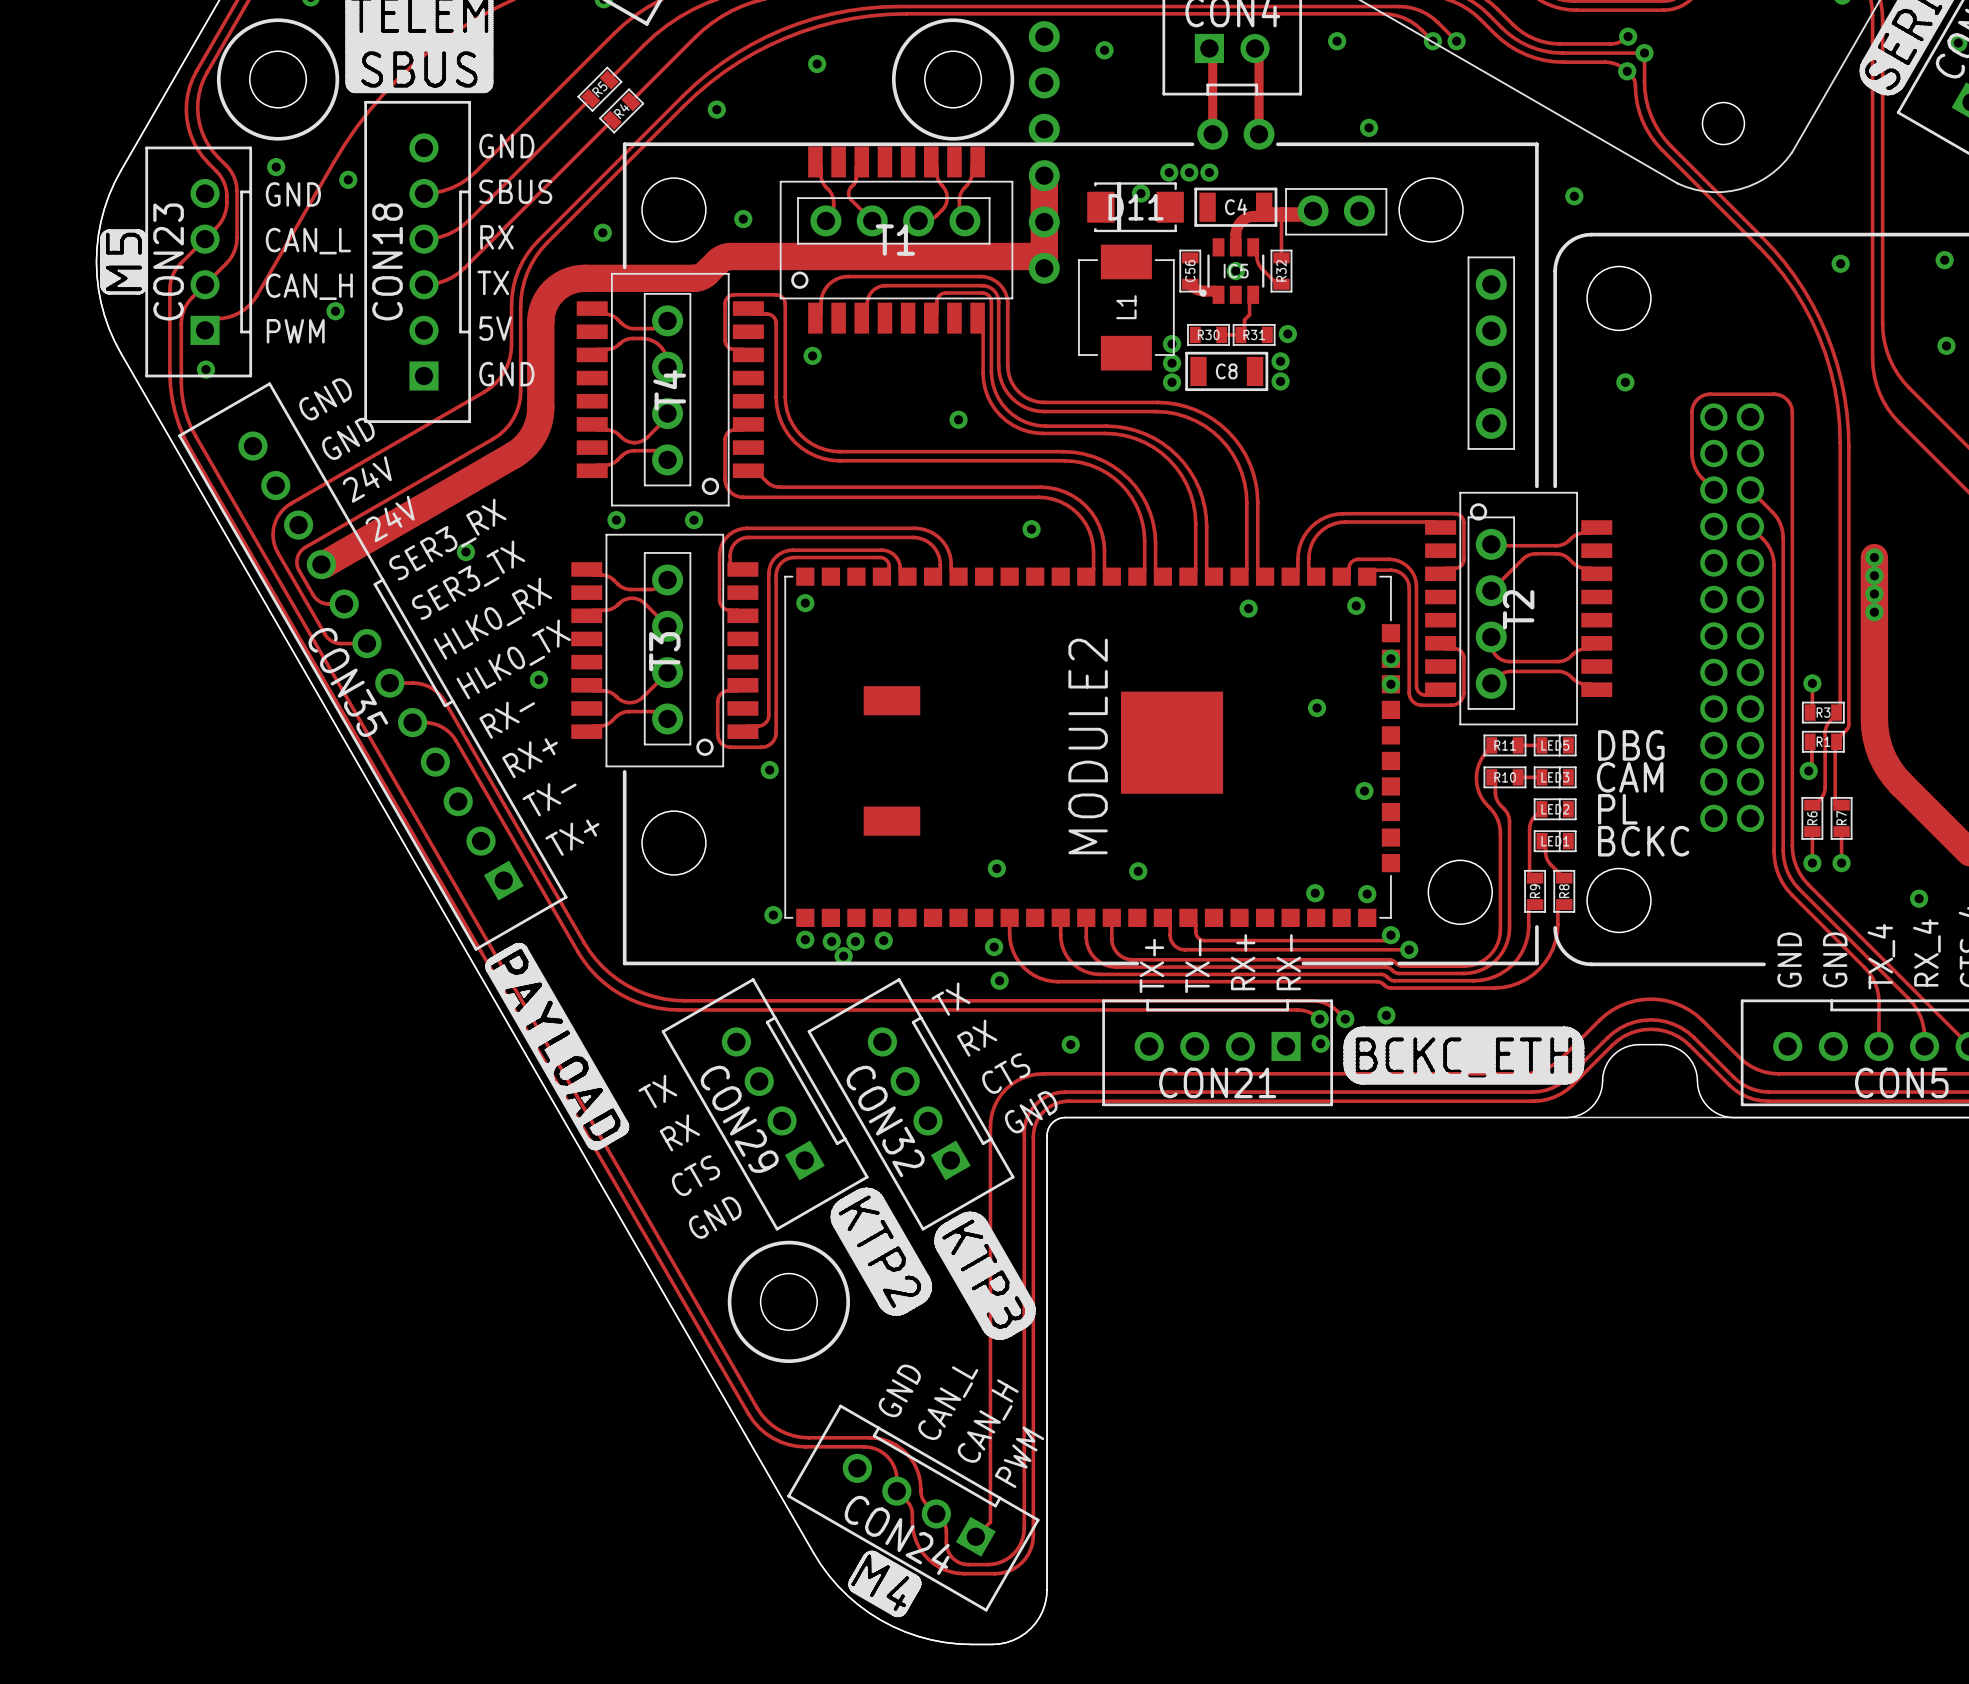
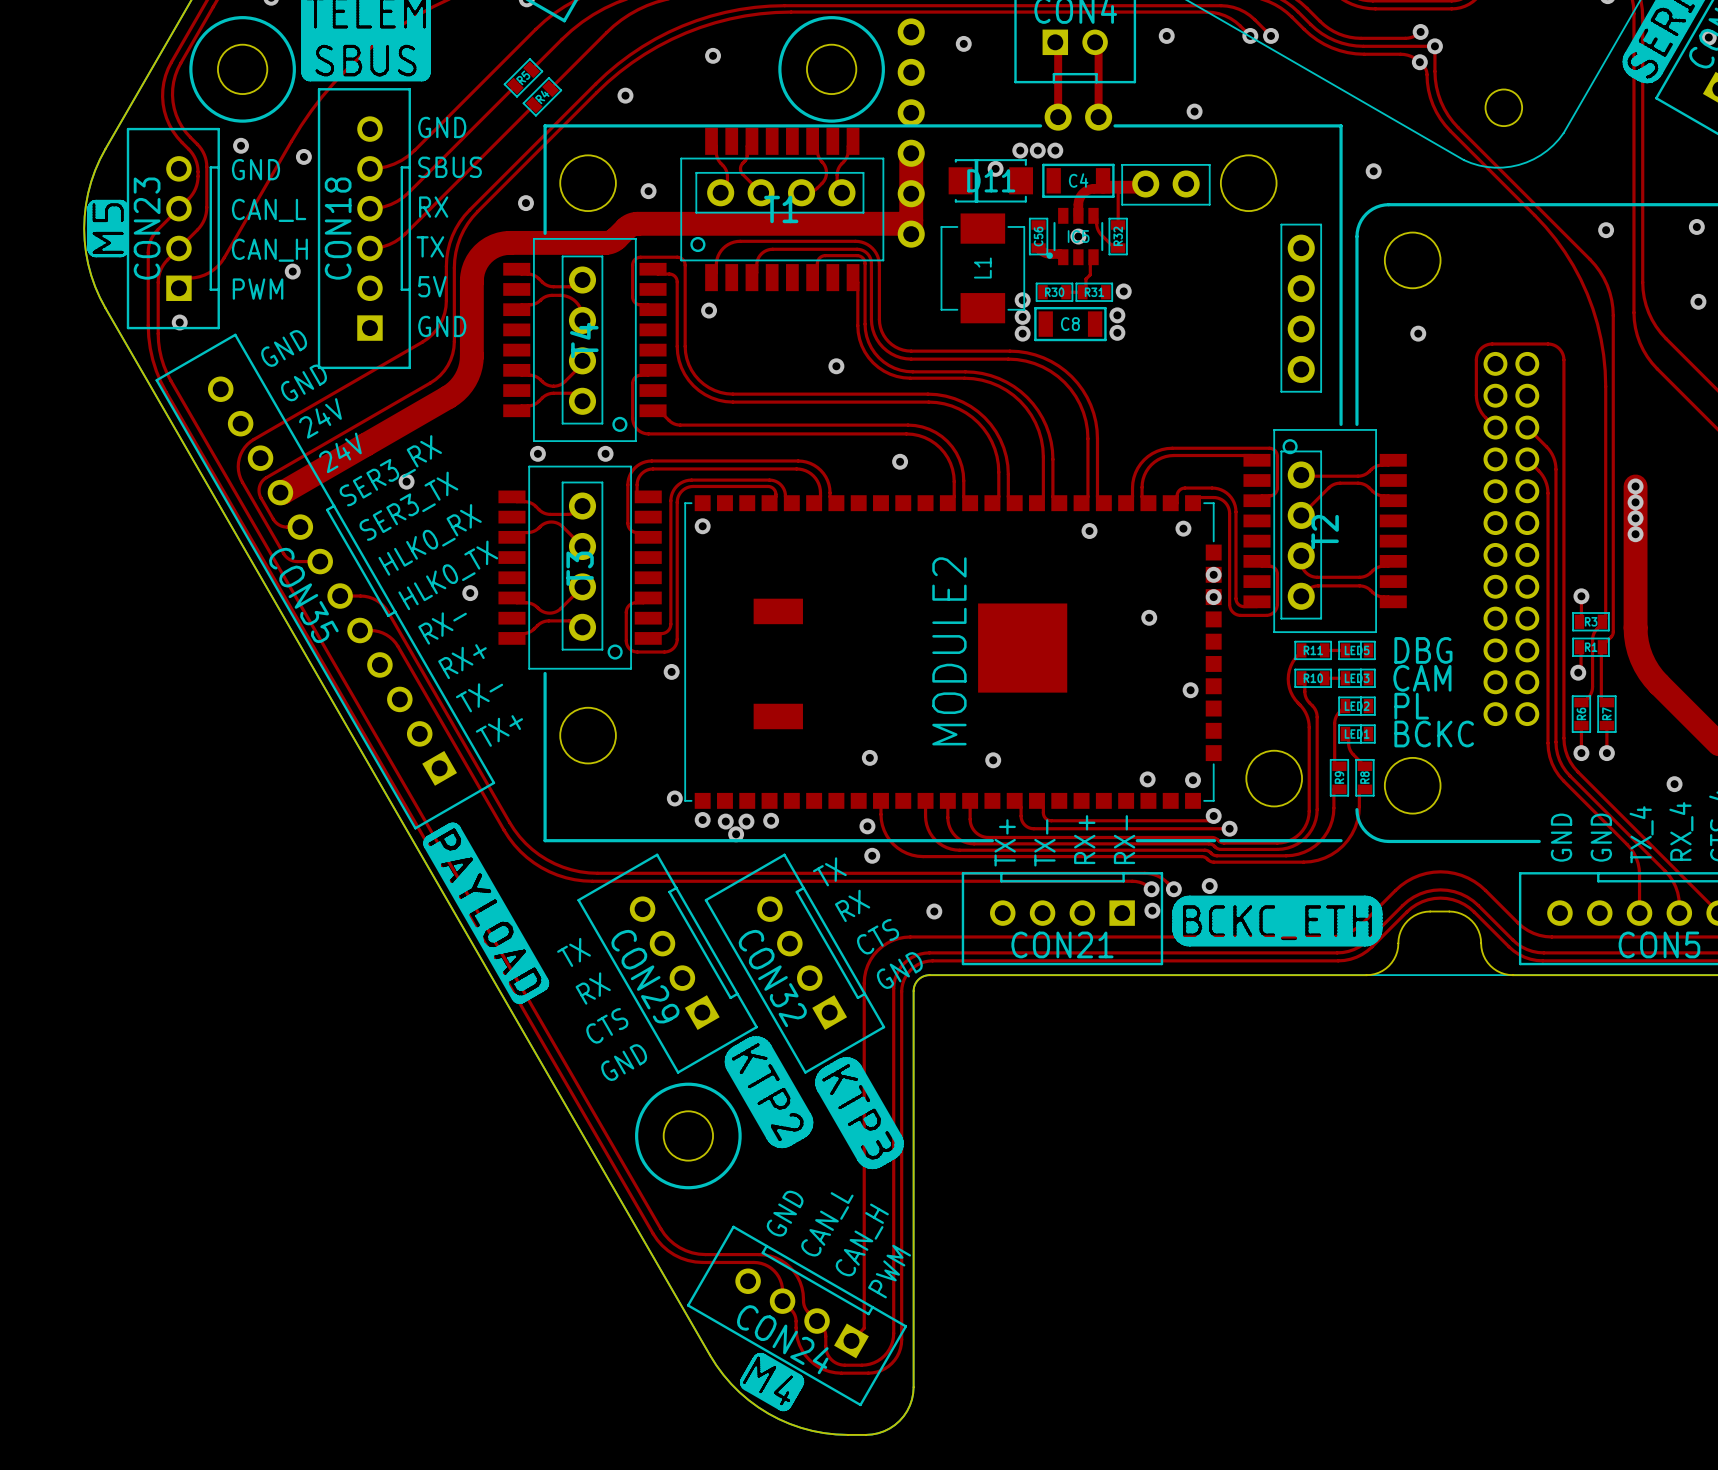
track: (1761, 237) (1784, 261) (1803, 289) (1826, 333) (1841, 380) (1847, 413) (1848, 446) -> (1537, 206) (1595, 265) (1607, 285) (1612, 307) (1613, 389)
line: (1536, 926) (1536, 963) -> none

